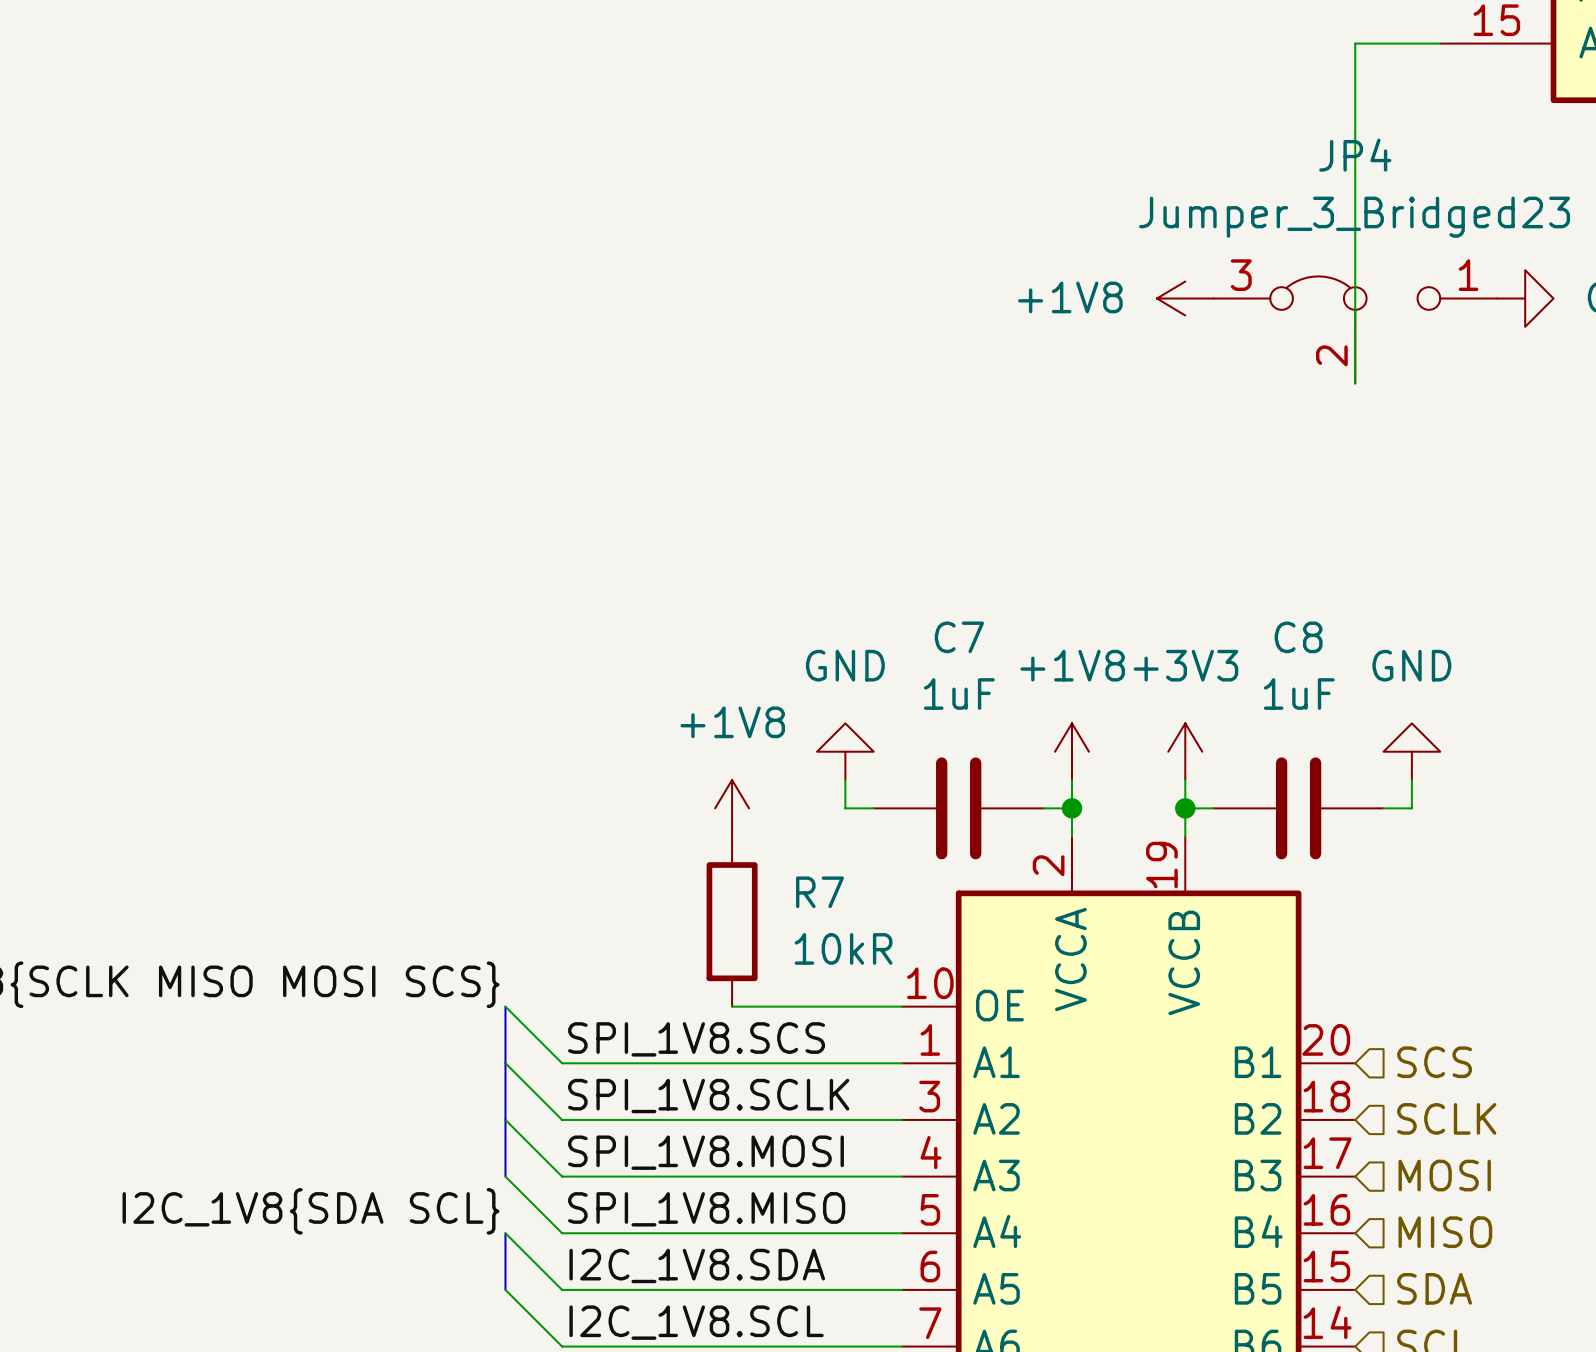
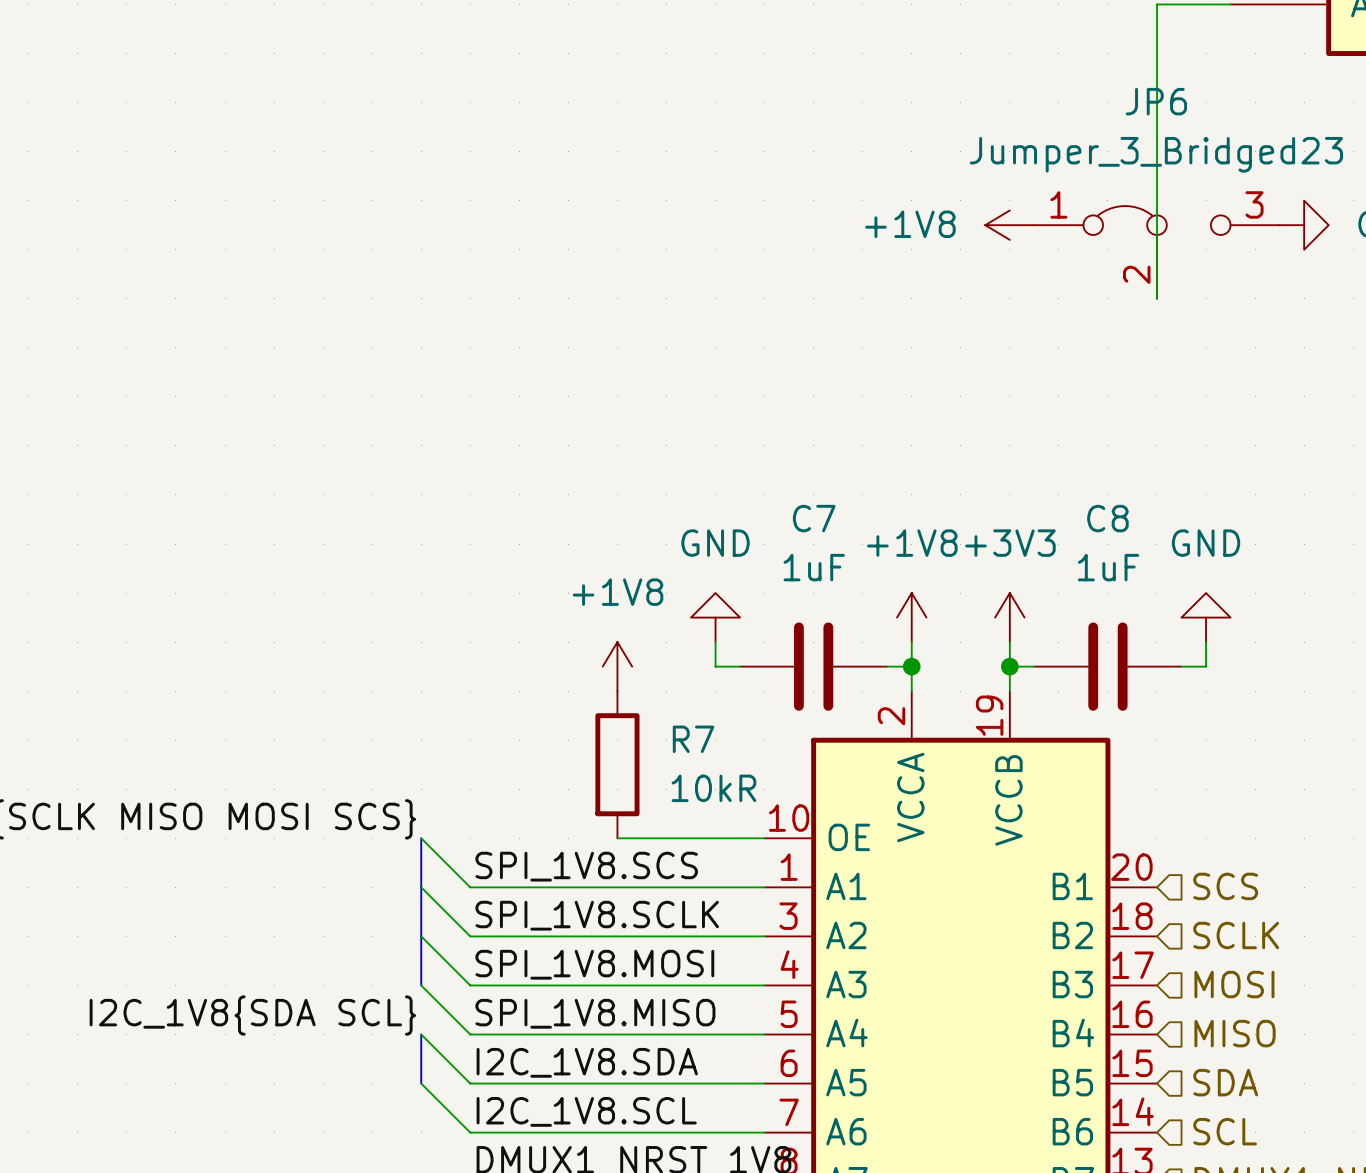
JP4 name: JP4 (1355, 155) -> JP6 (1156, 101)
JP4 pin number: 3 (1241, 275) -> 1 (1058, 204)
JP4 pin number: 1 (1468, 275) -> 3 (1254, 204)

